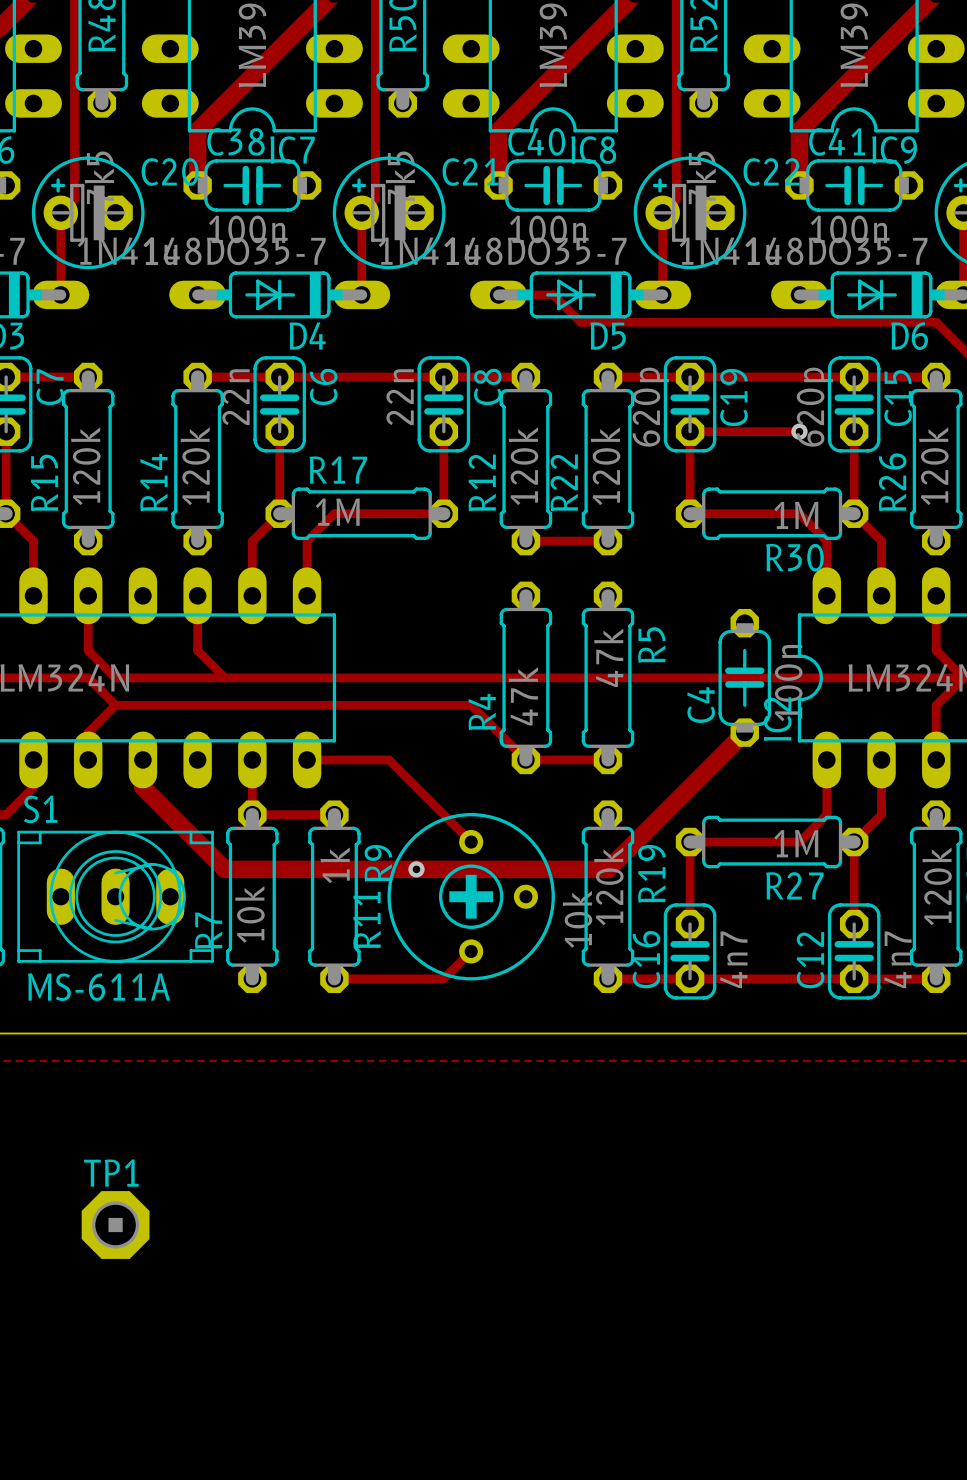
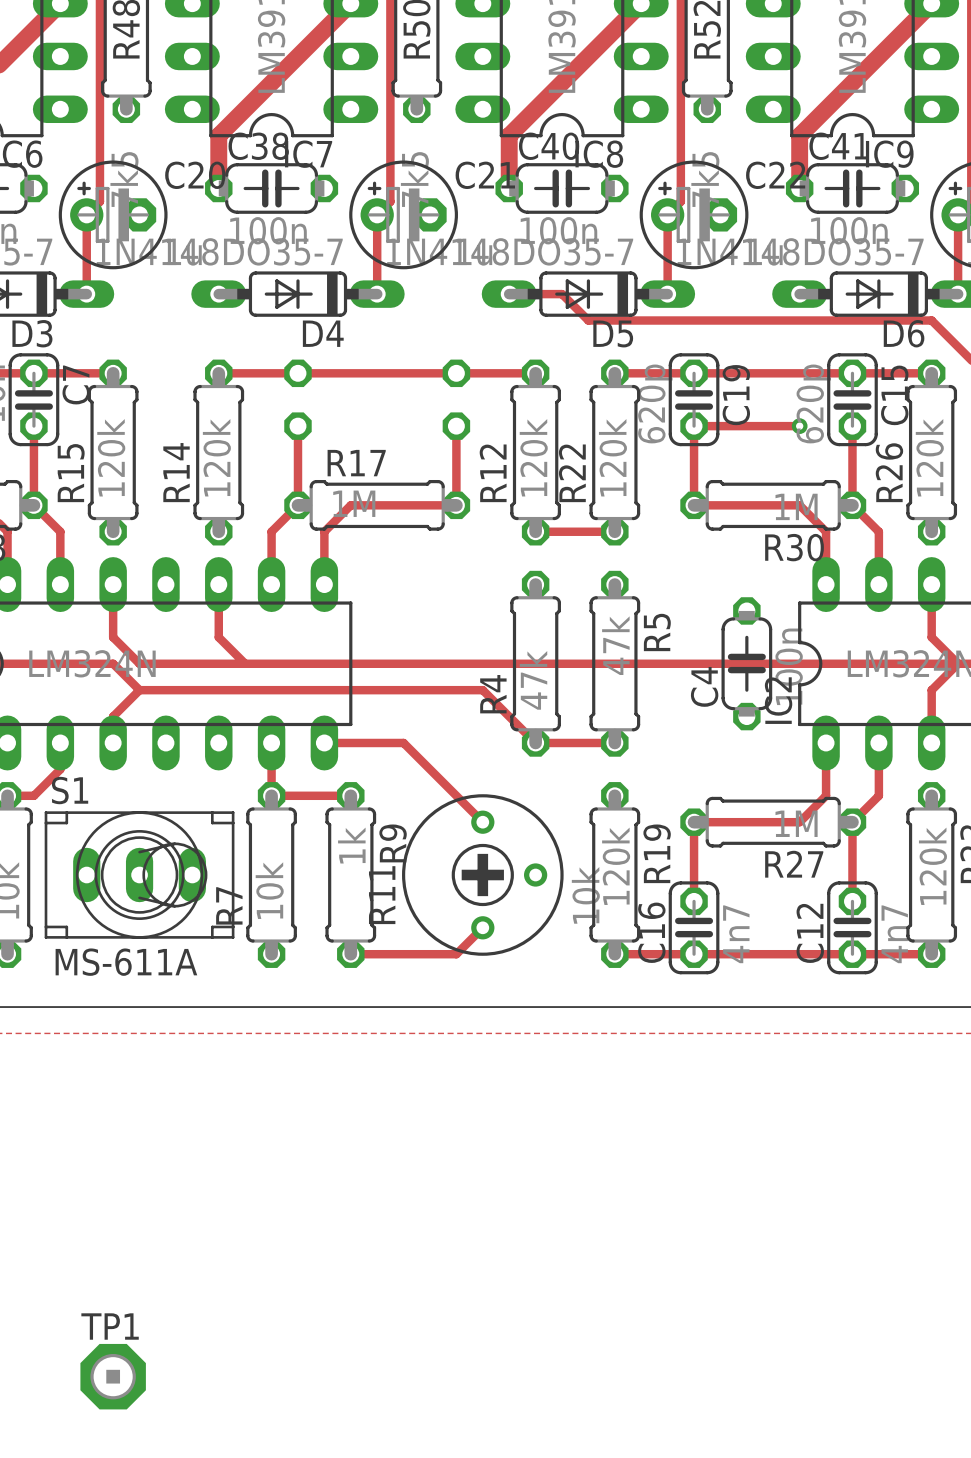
C6 side: top (279, 404) -> bottom (297, 399)
C8 side: top (443, 404) -> bottom (456, 399)
track: (744, 732) (607, 869) (224, 869) (142, 787) (142, 759) -> none
via: (416, 869) -> none
TP1 position: (115, 1225) -> (113, 1376)

